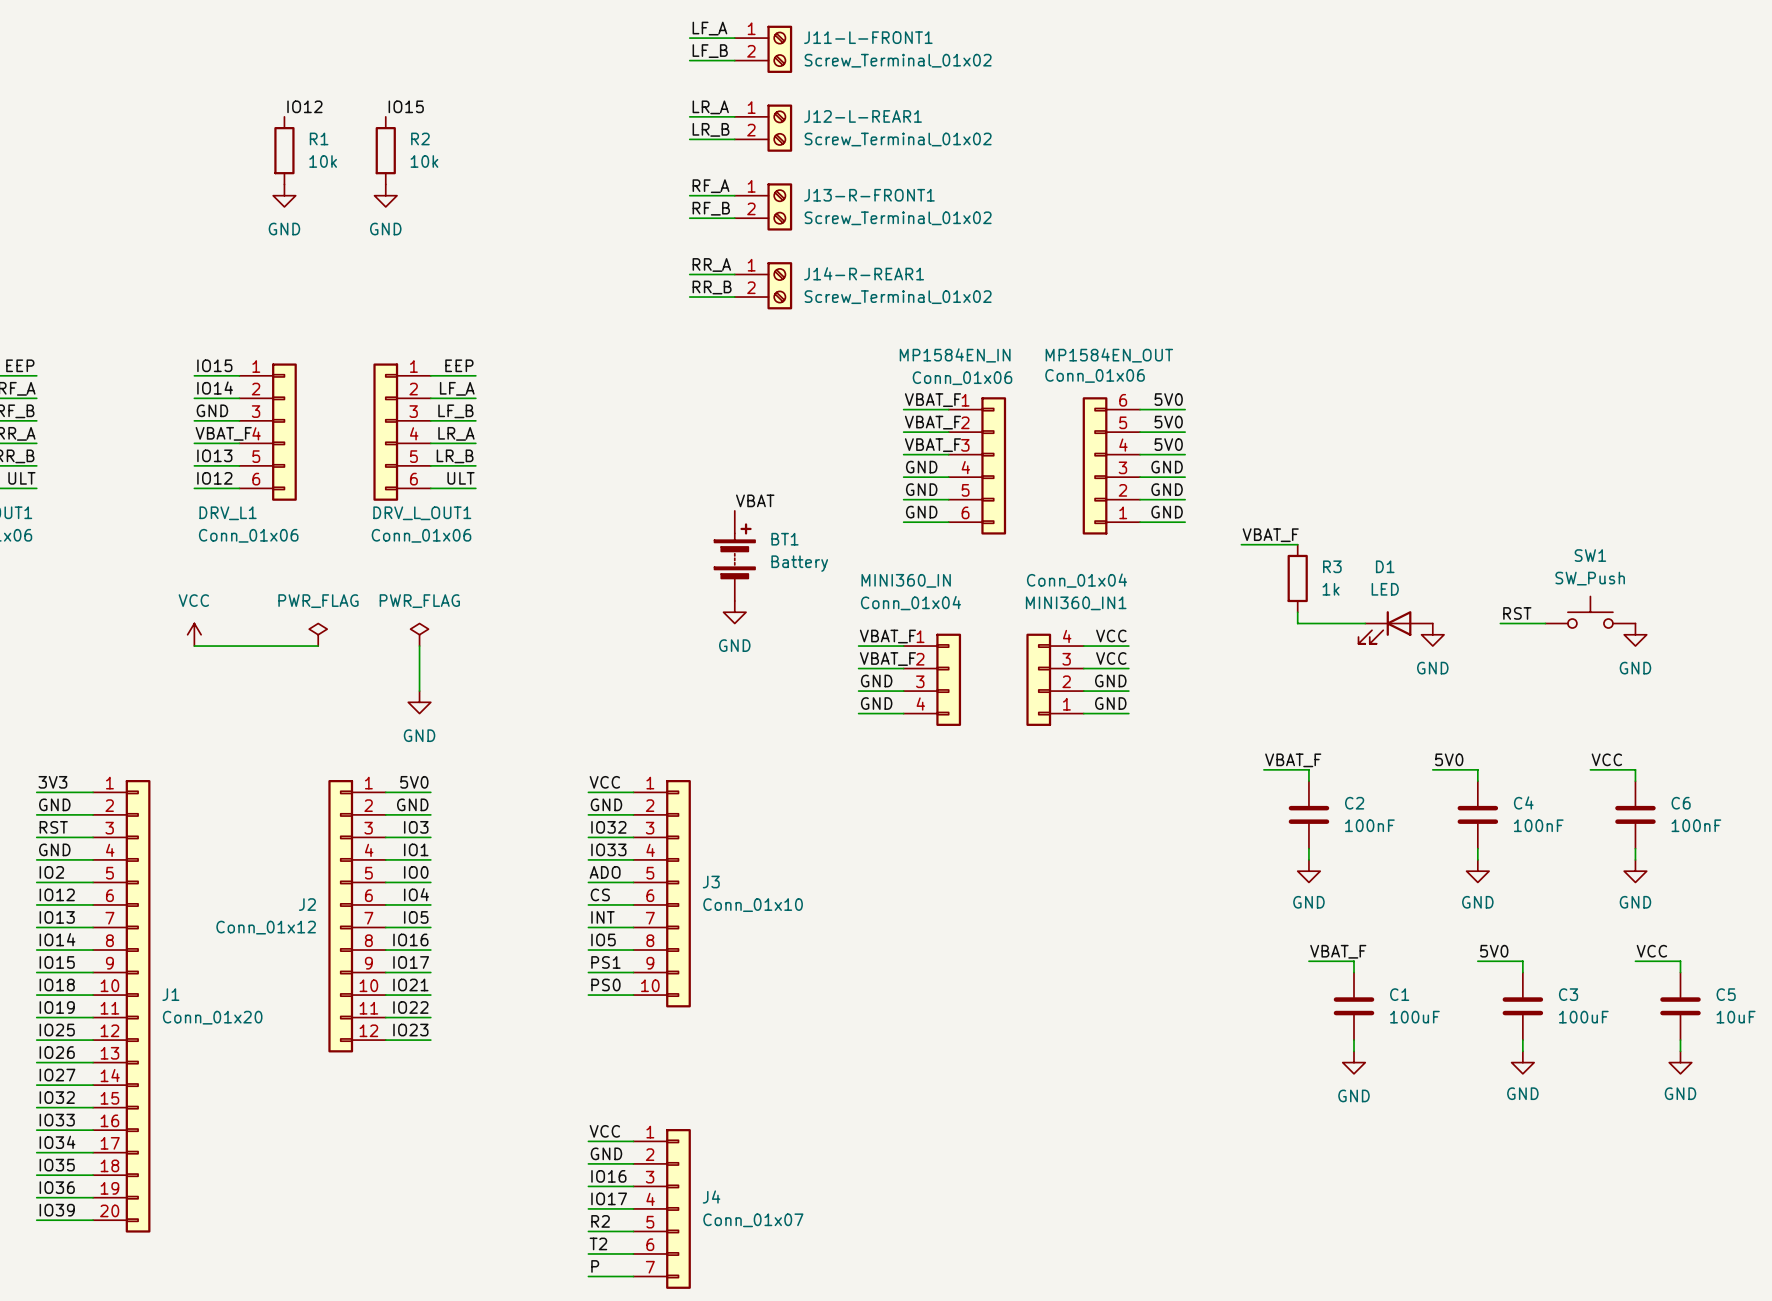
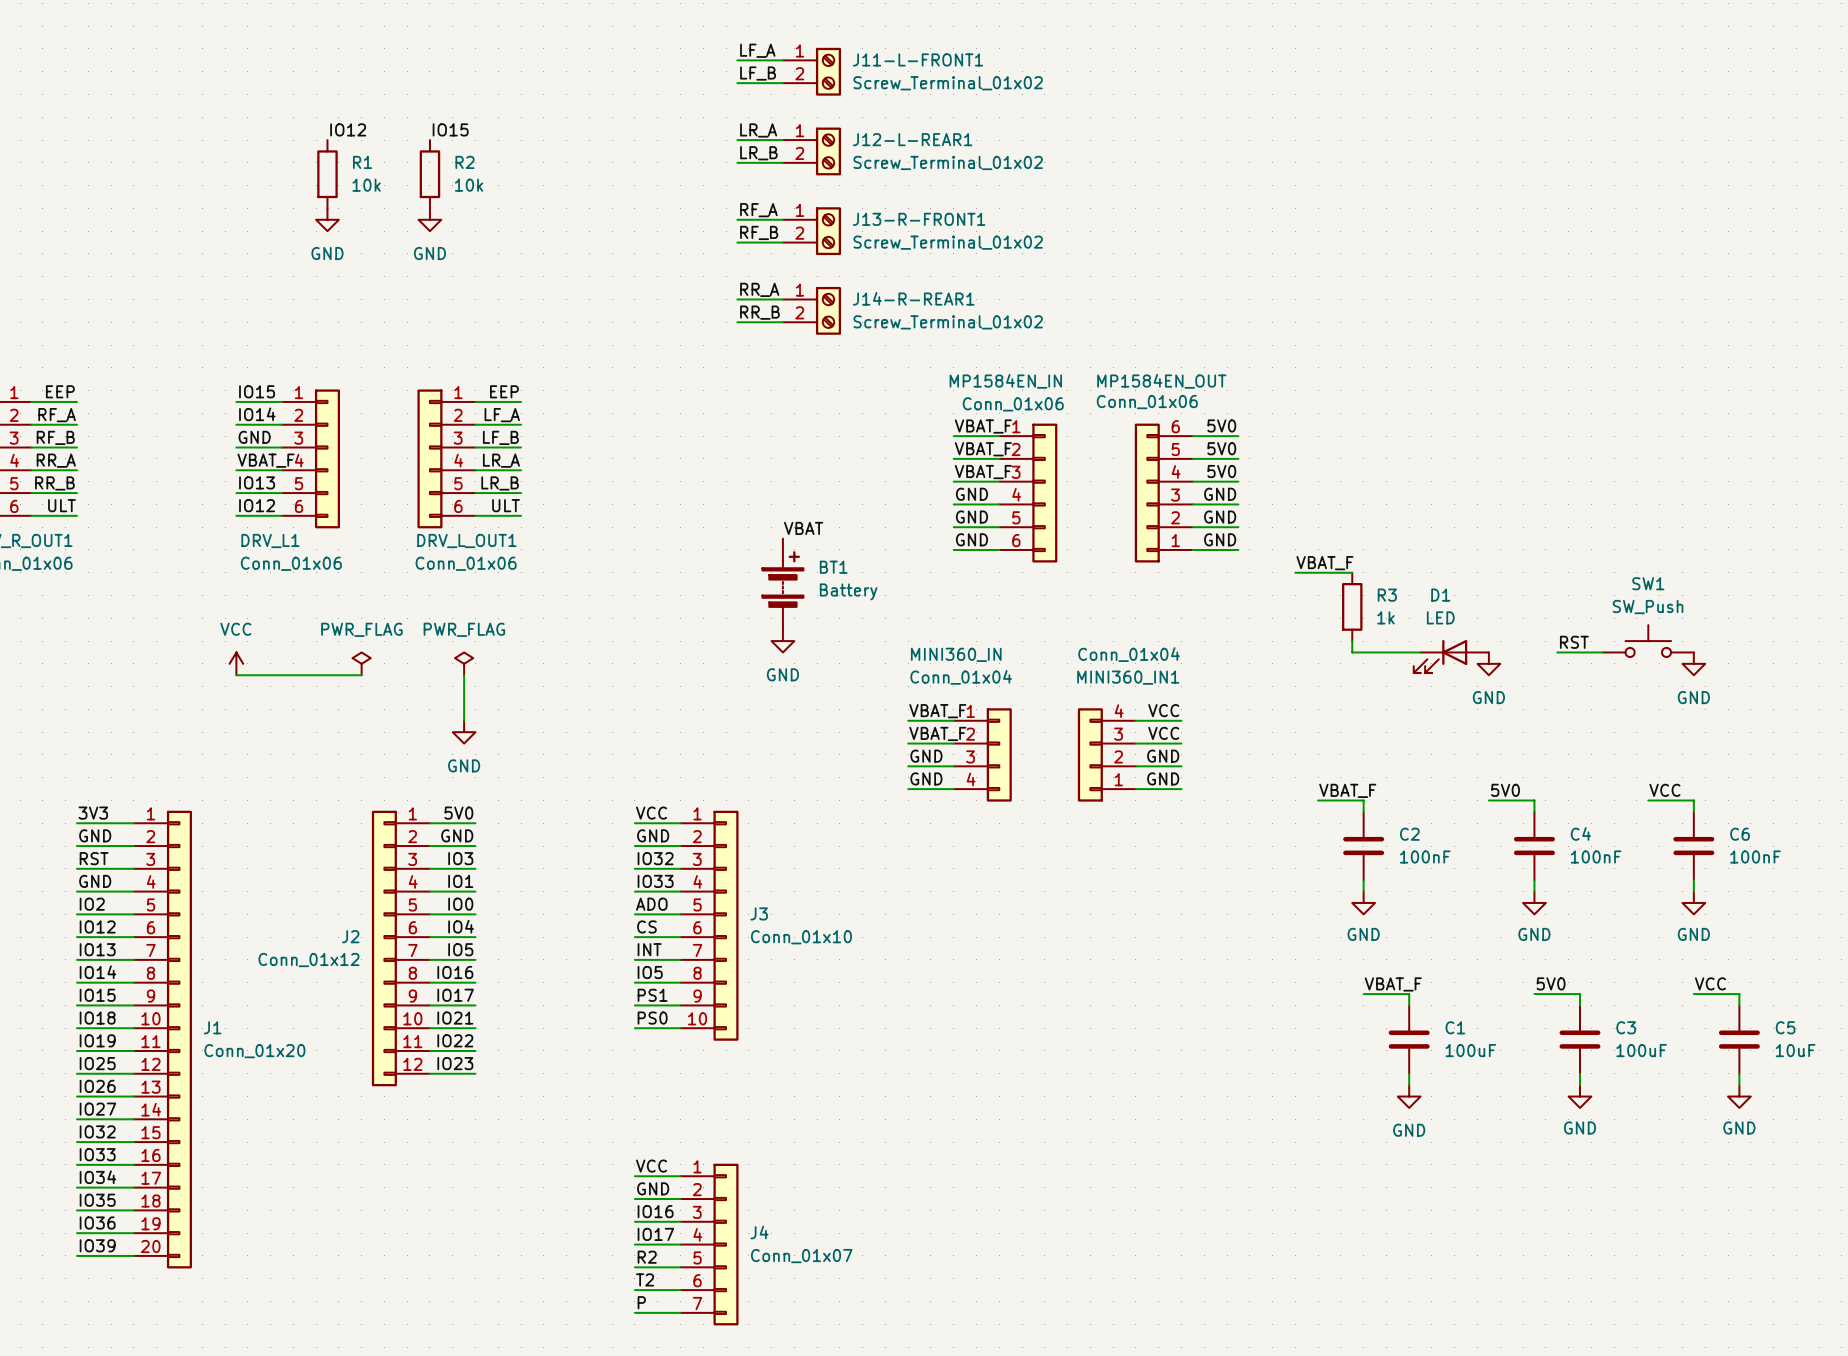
label: VCC (1111, 635) -> none
label: VBAT_F (887, 636) -> none
wire: (858, 646) (903, 646) -> (908, 766) (953, 766)
wire: (1083, 646) (1128, 646) -> (1135, 766) (1181, 766)
label: VCC (1111, 658) -> none
label: VBAT_F (887, 659) -> none
wire: (858, 668) (903, 668) -> (908, 789) (953, 789)
wire: (1083, 668) (1128, 668) -> (1135, 789) (1181, 789)
MINI360_IN position: (932, 679) -> (982, 754)
MINI360_IN1 position: (1055, 679) -> (1106, 754)
label: GND (876, 681) -> VBAT_F (937, 711)
label: GND (1110, 681) -> VCC (1163, 710)
label: GND (876, 703) -> VBAT_F (937, 733)
label: GND (1110, 703) -> VCC (1163, 733)
label: none -> GND (926, 756)
label: none -> GND (1163, 756)
label: none -> GND (926, 778)
label: none -> GND (1163, 778)

